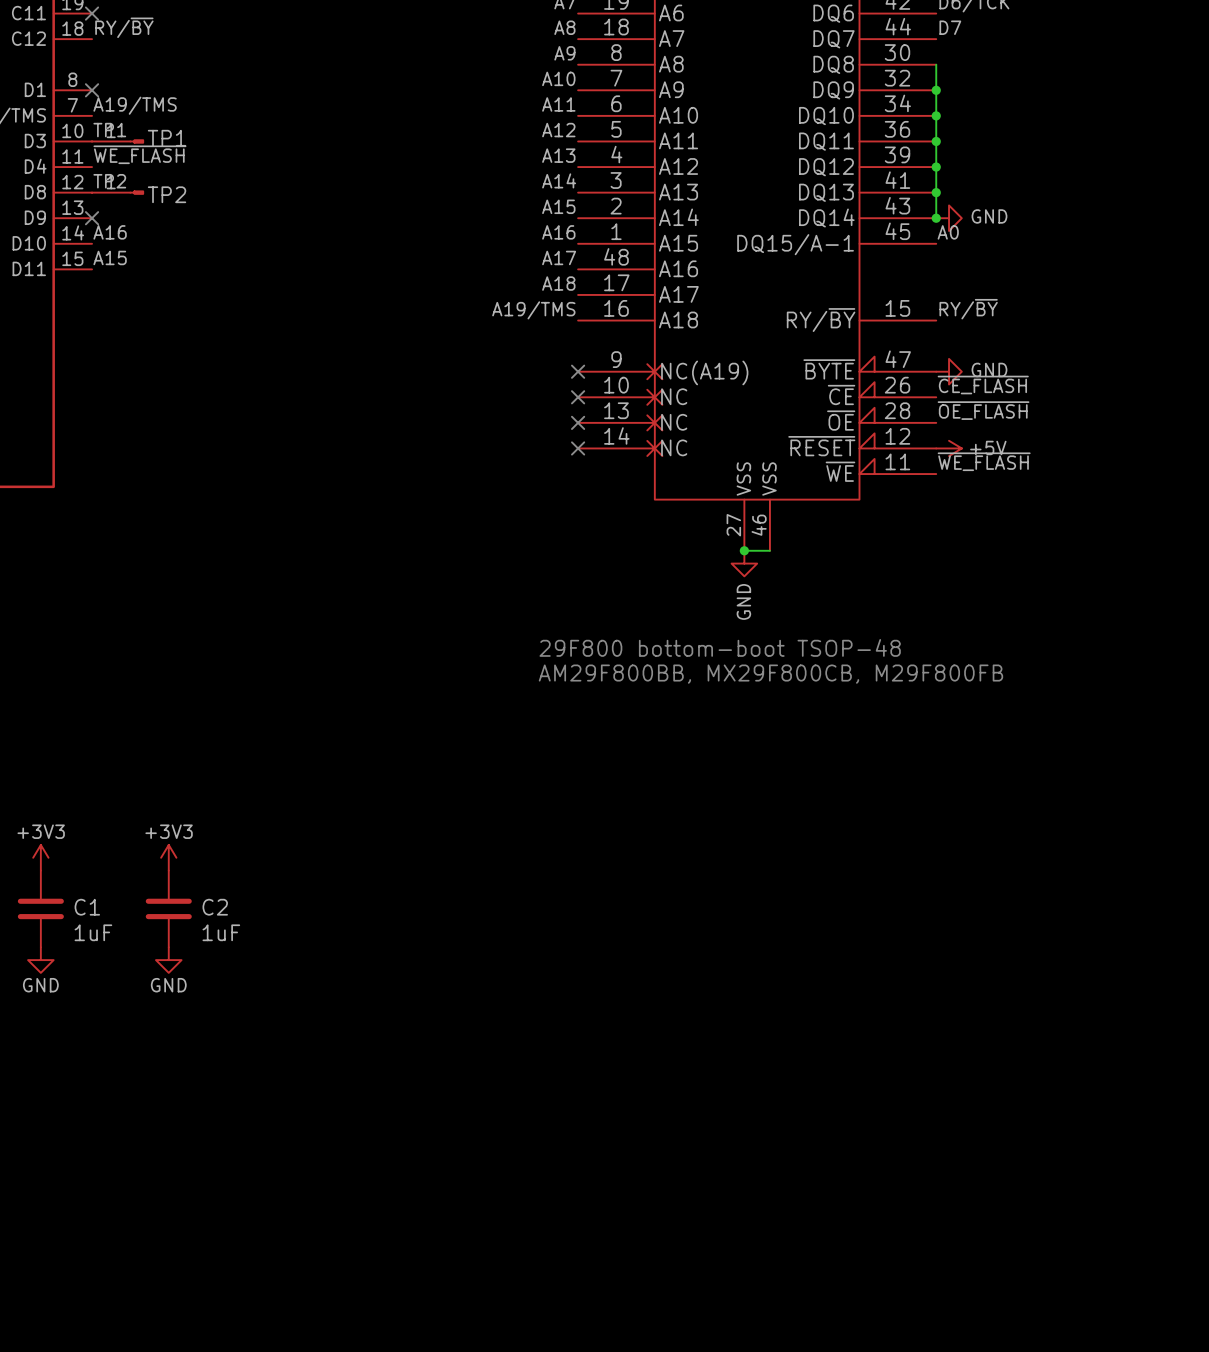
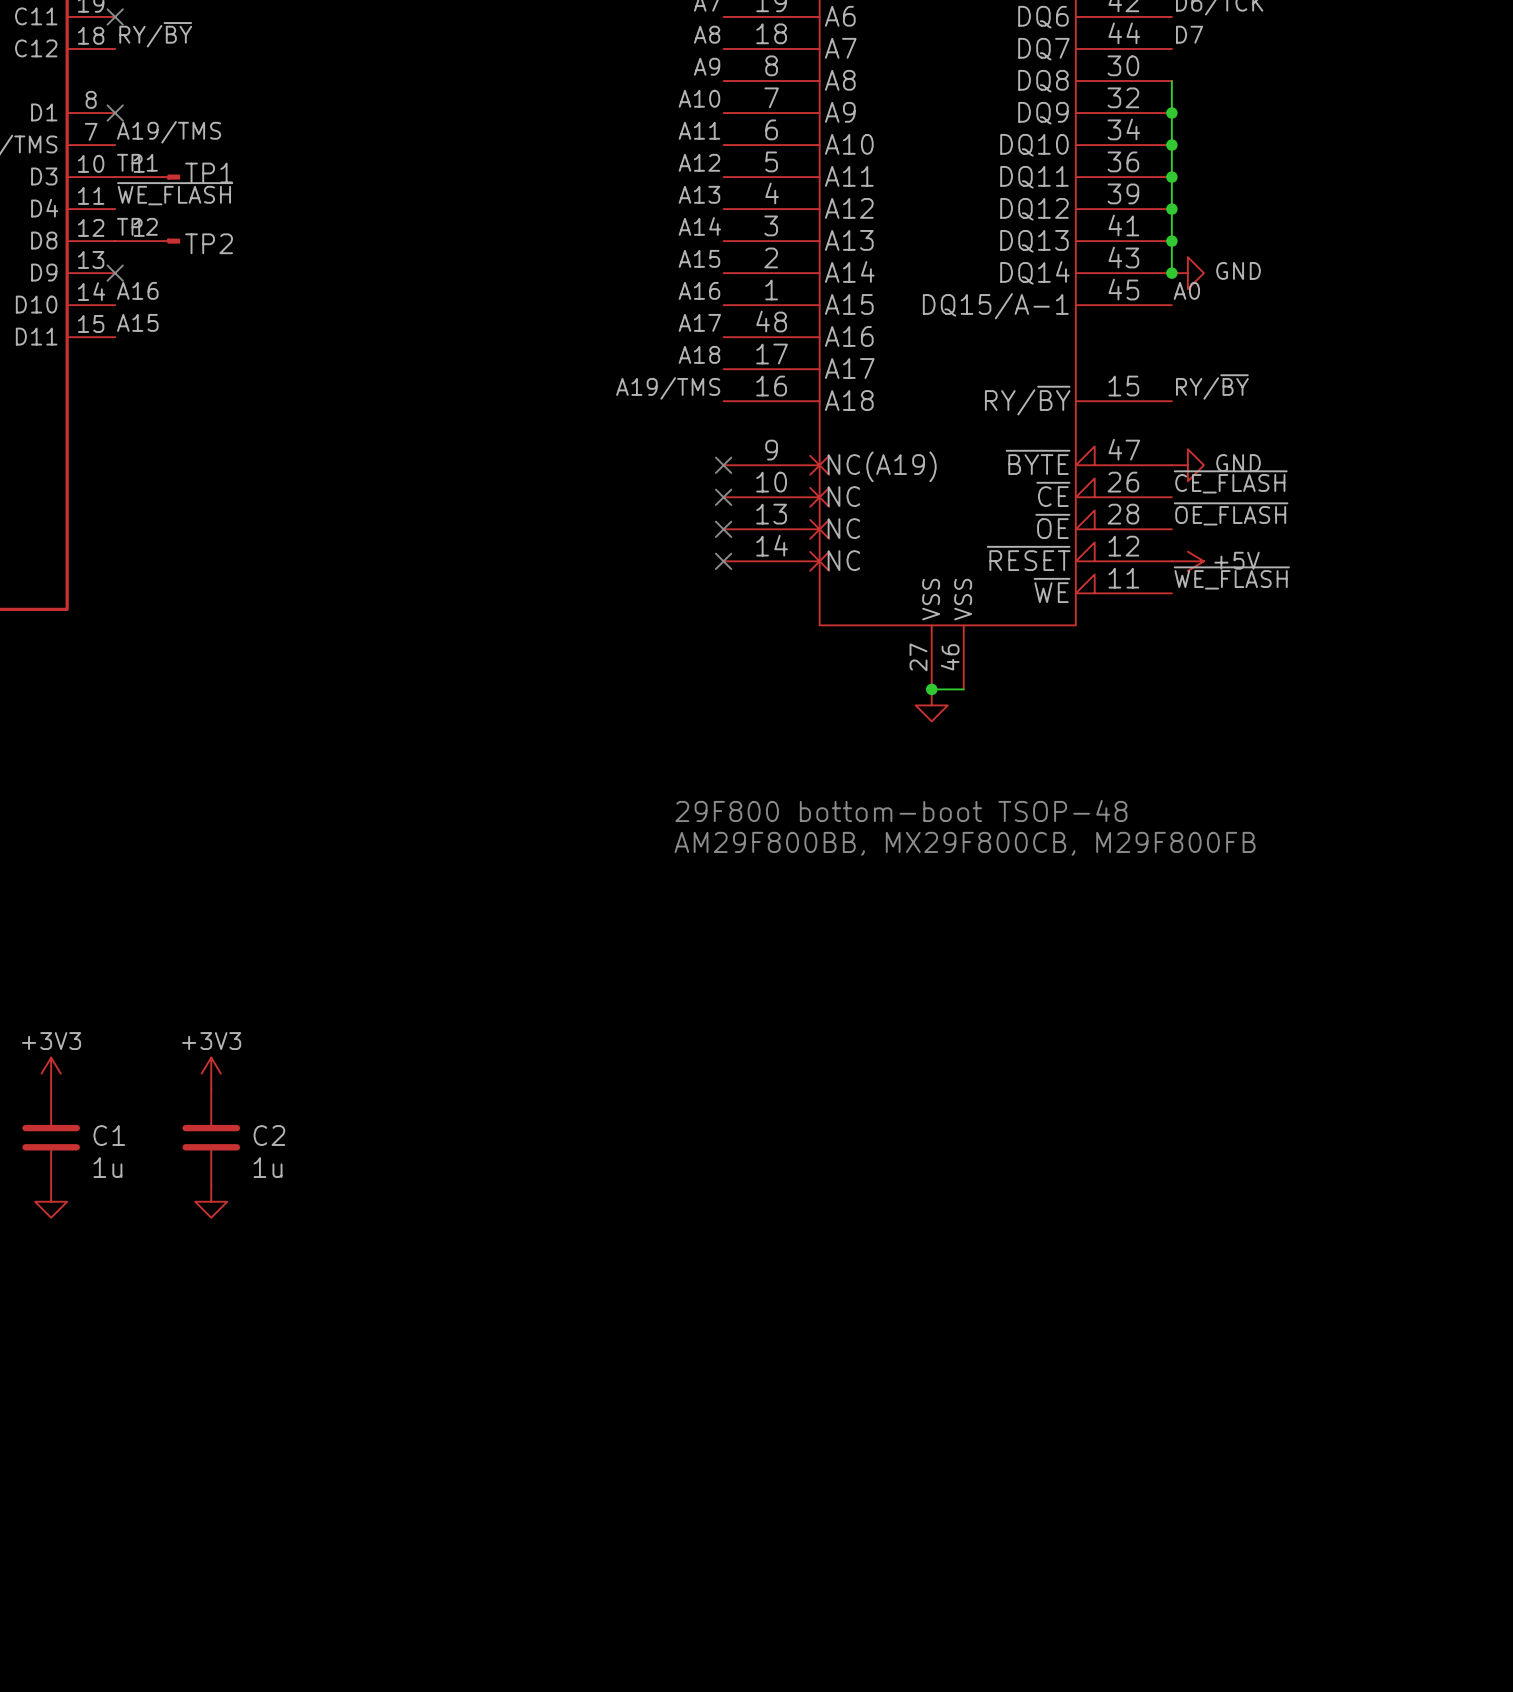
power symbol text: GND (743, 601) -> none
C1 value: 1uF (93, 932) -> 1u (107, 1167)
C2 value: 1uF (221, 932) -> 1u (268, 1167)
power symbol text: GND (40, 985) -> none
power symbol text: GND (168, 985) -> none

